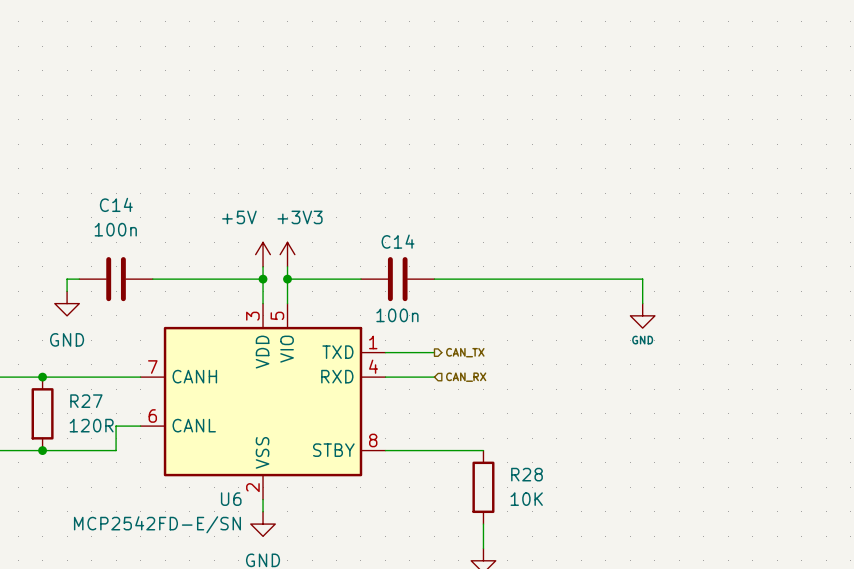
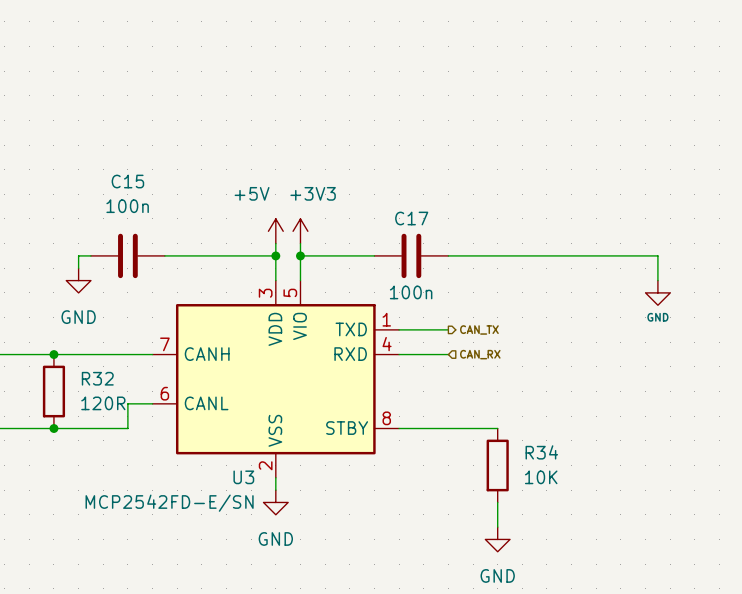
C14 name: C14 (116, 204) -> C15 (127, 181)
C14 name: C14 (398, 241) -> C17 (411, 218)
R27 name: R27 (86, 401) -> R32 (97, 378)
R28 name: R28 (527, 474) -> R34 (541, 452)
U6 name: U6 (231, 499) -> U3 (243, 477)

